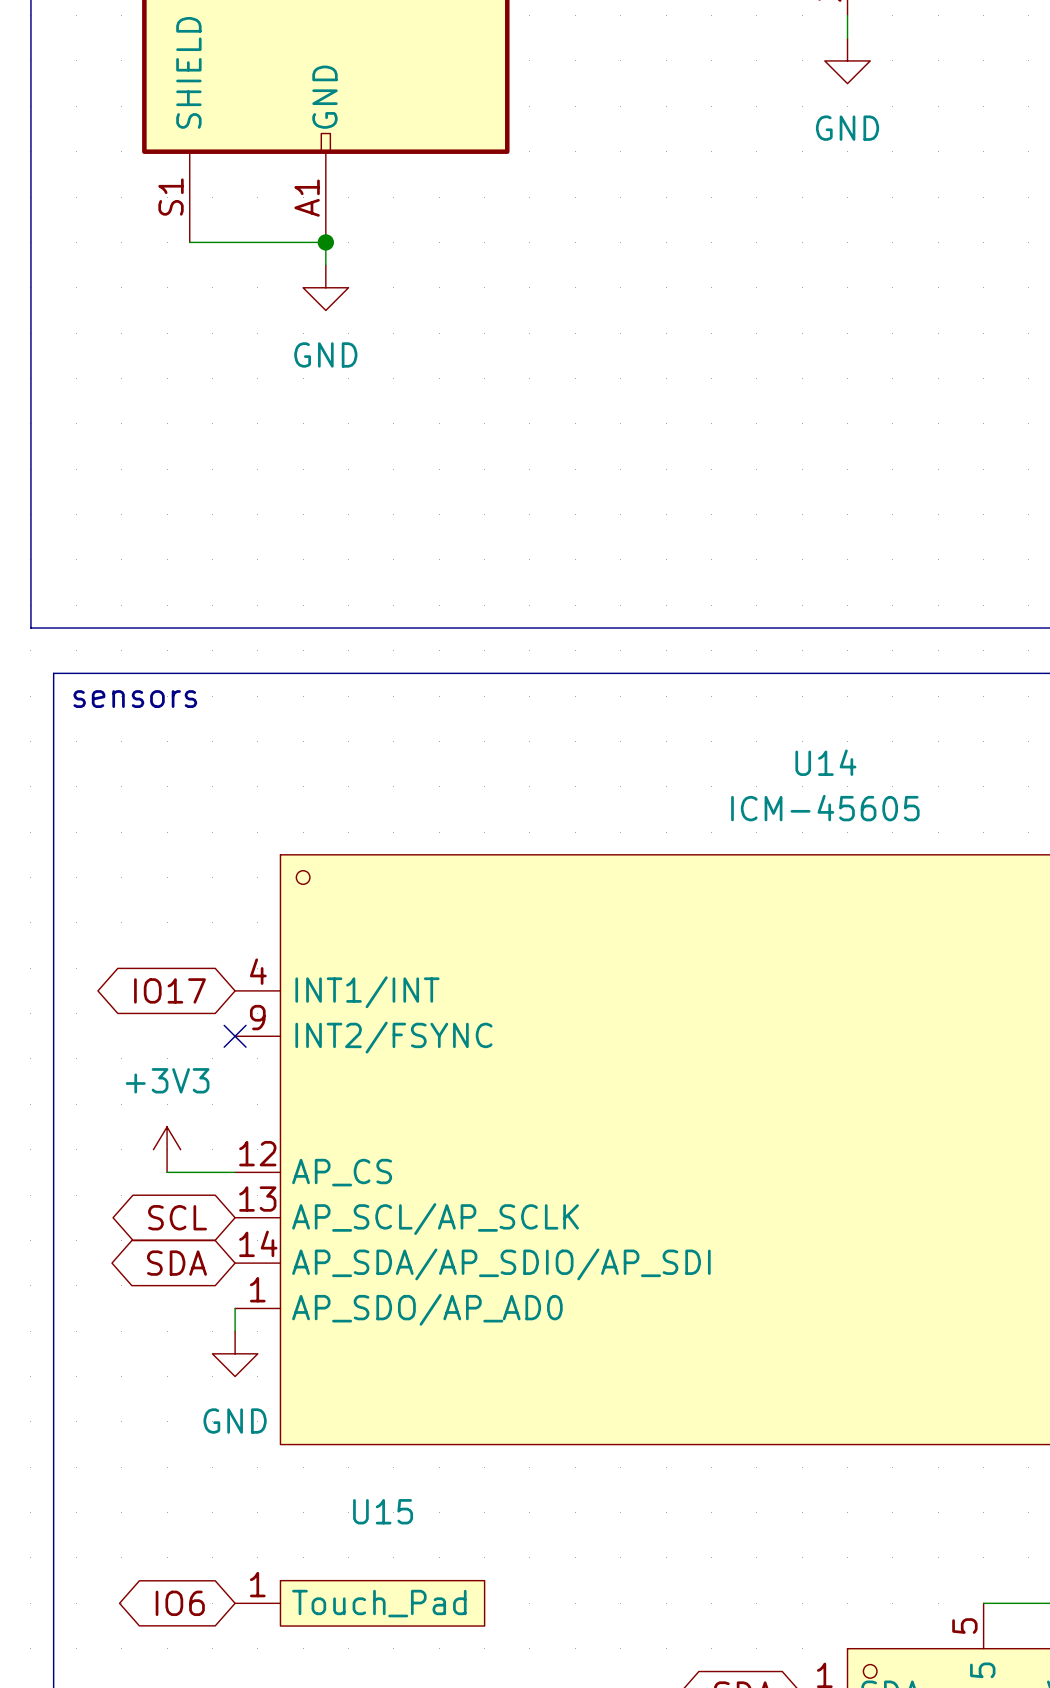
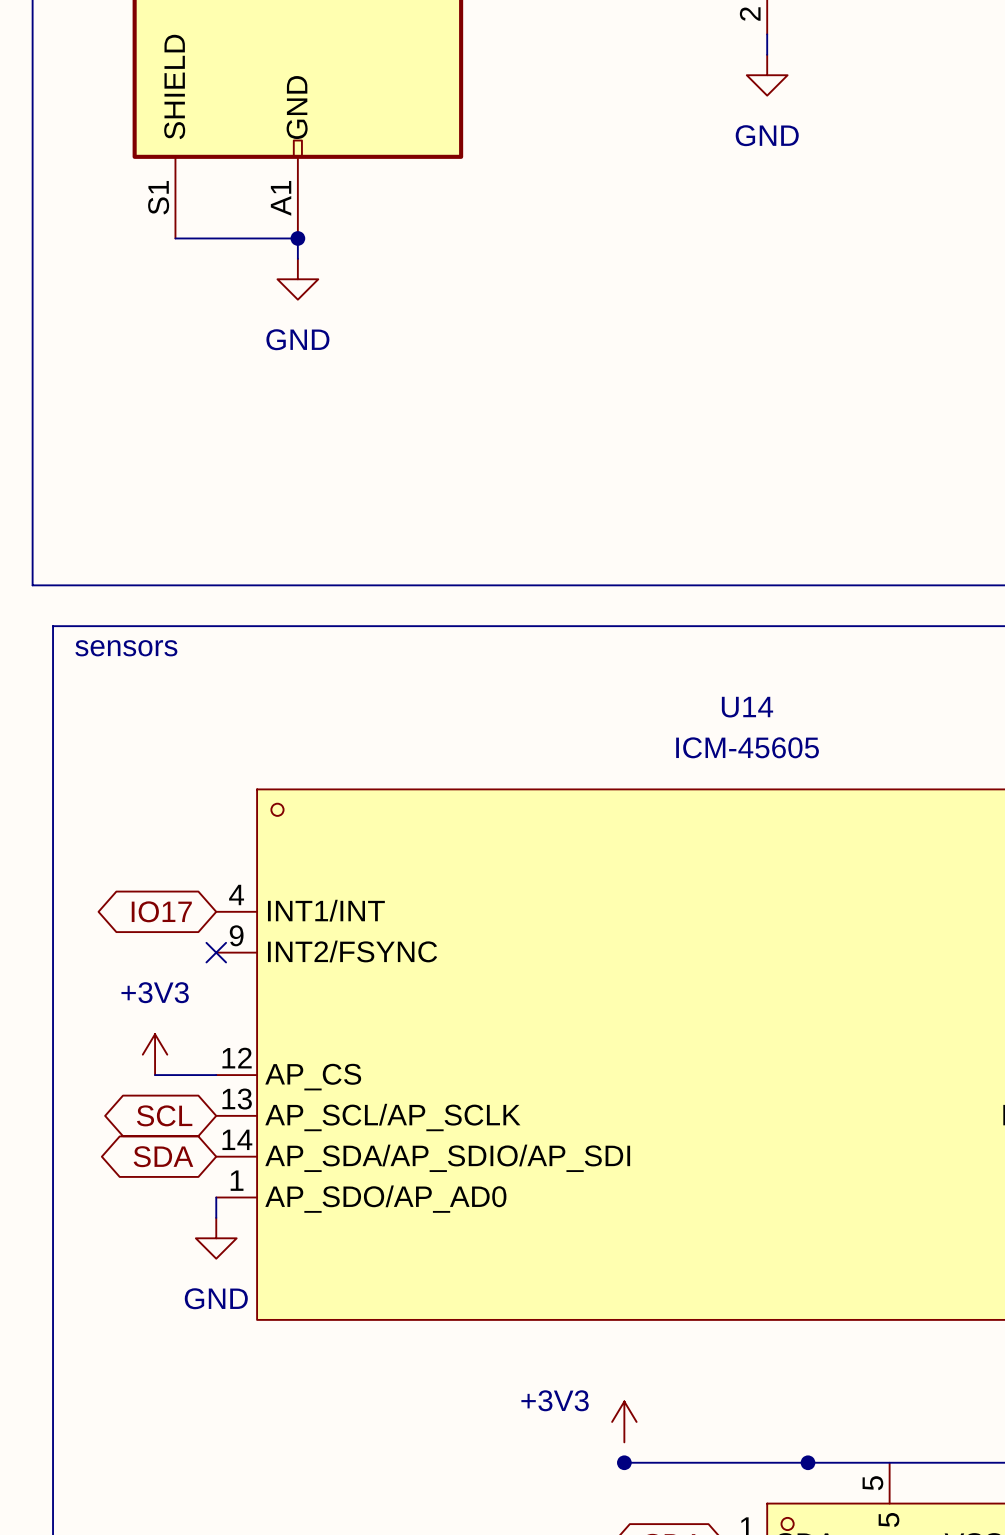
power symbol: none -> +3V3 (624, 1421)
global label: IO6 (180, 1603) -> none
U15: (359, 1603) -> none
wire: none -> (624, 1462) (889, 1462)
junction: none -> (624, 1462)
junction: none -> (808, 1462)

